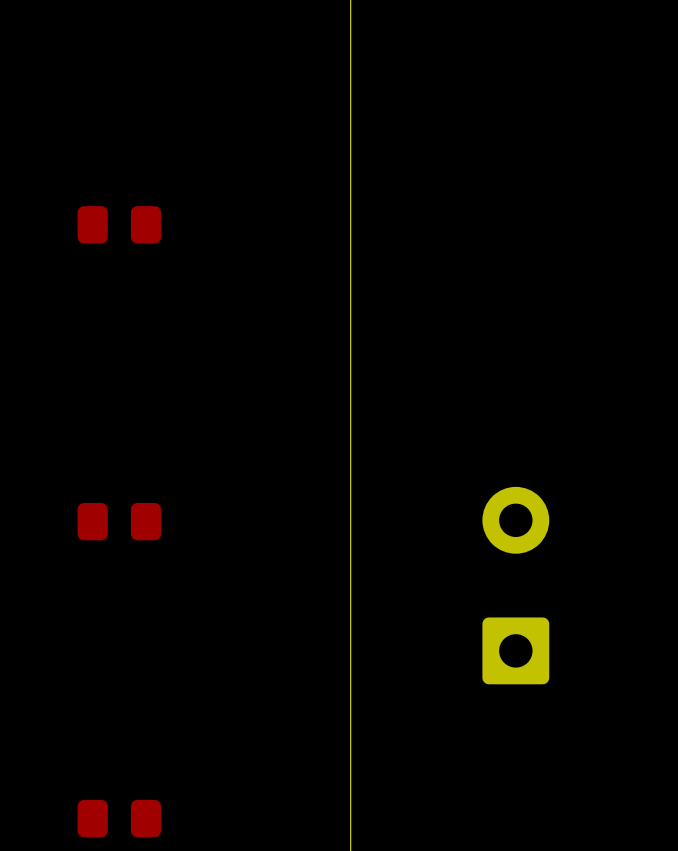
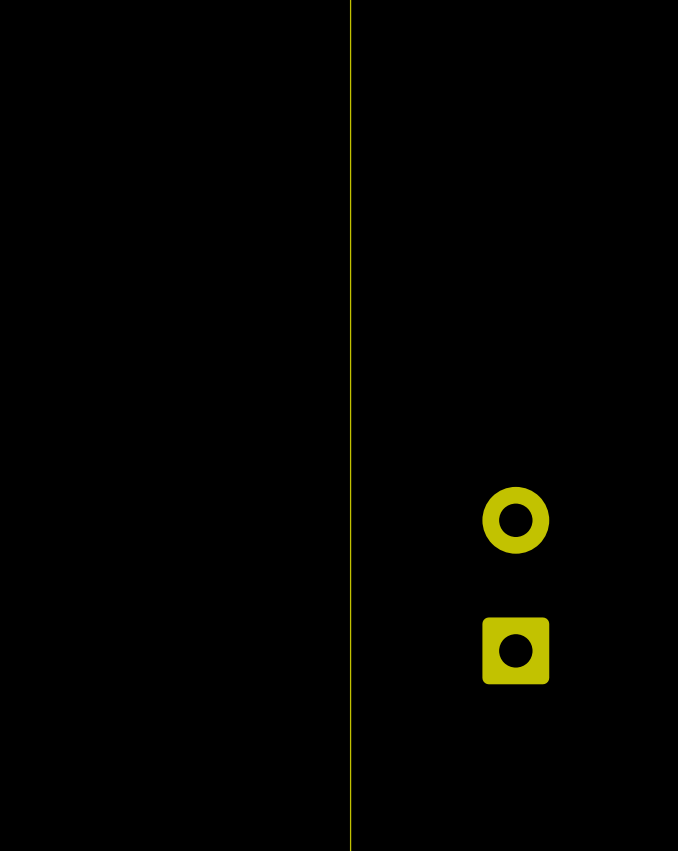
part: (119, 224) -> none
part: (119, 521) -> none
part: (119, 818) -> none

